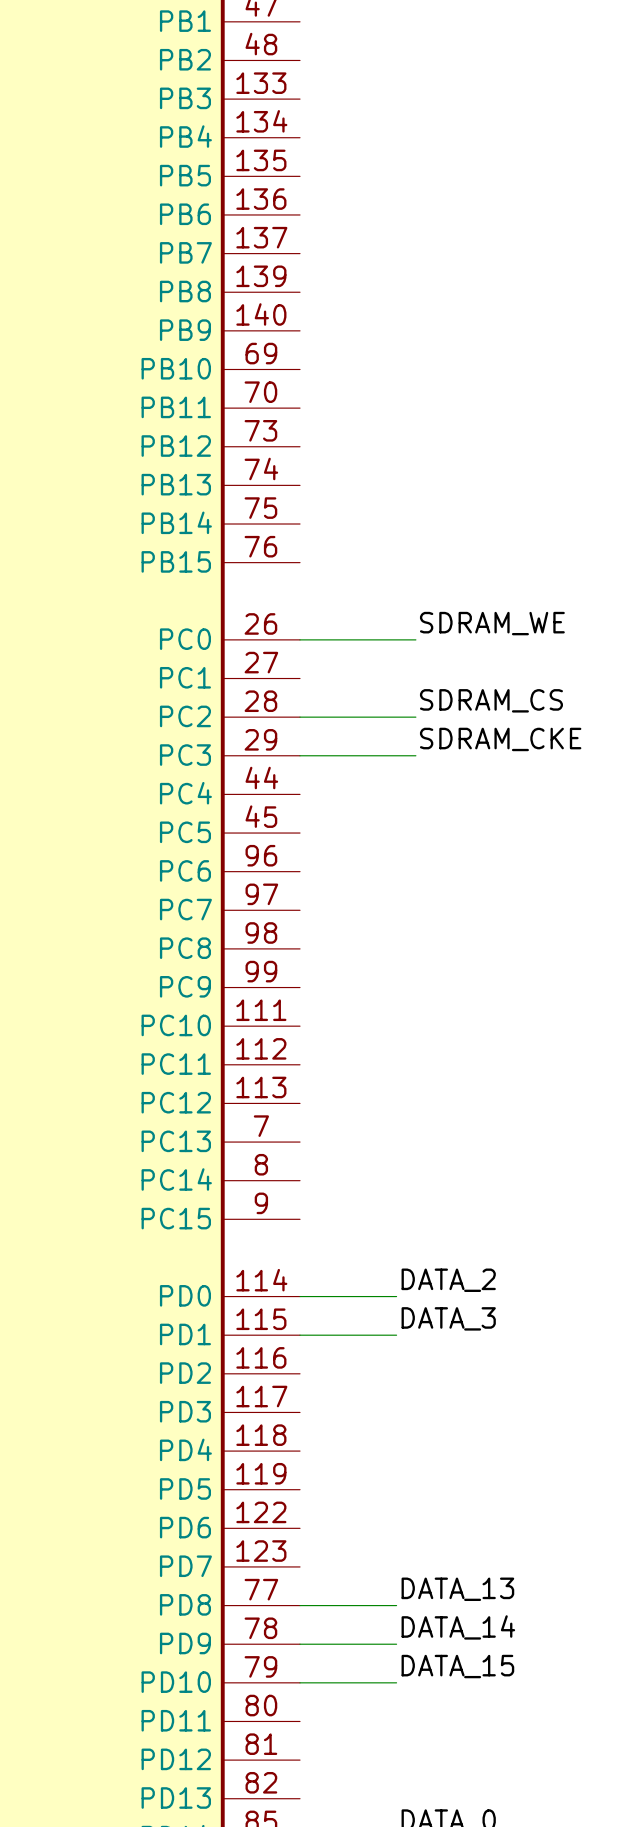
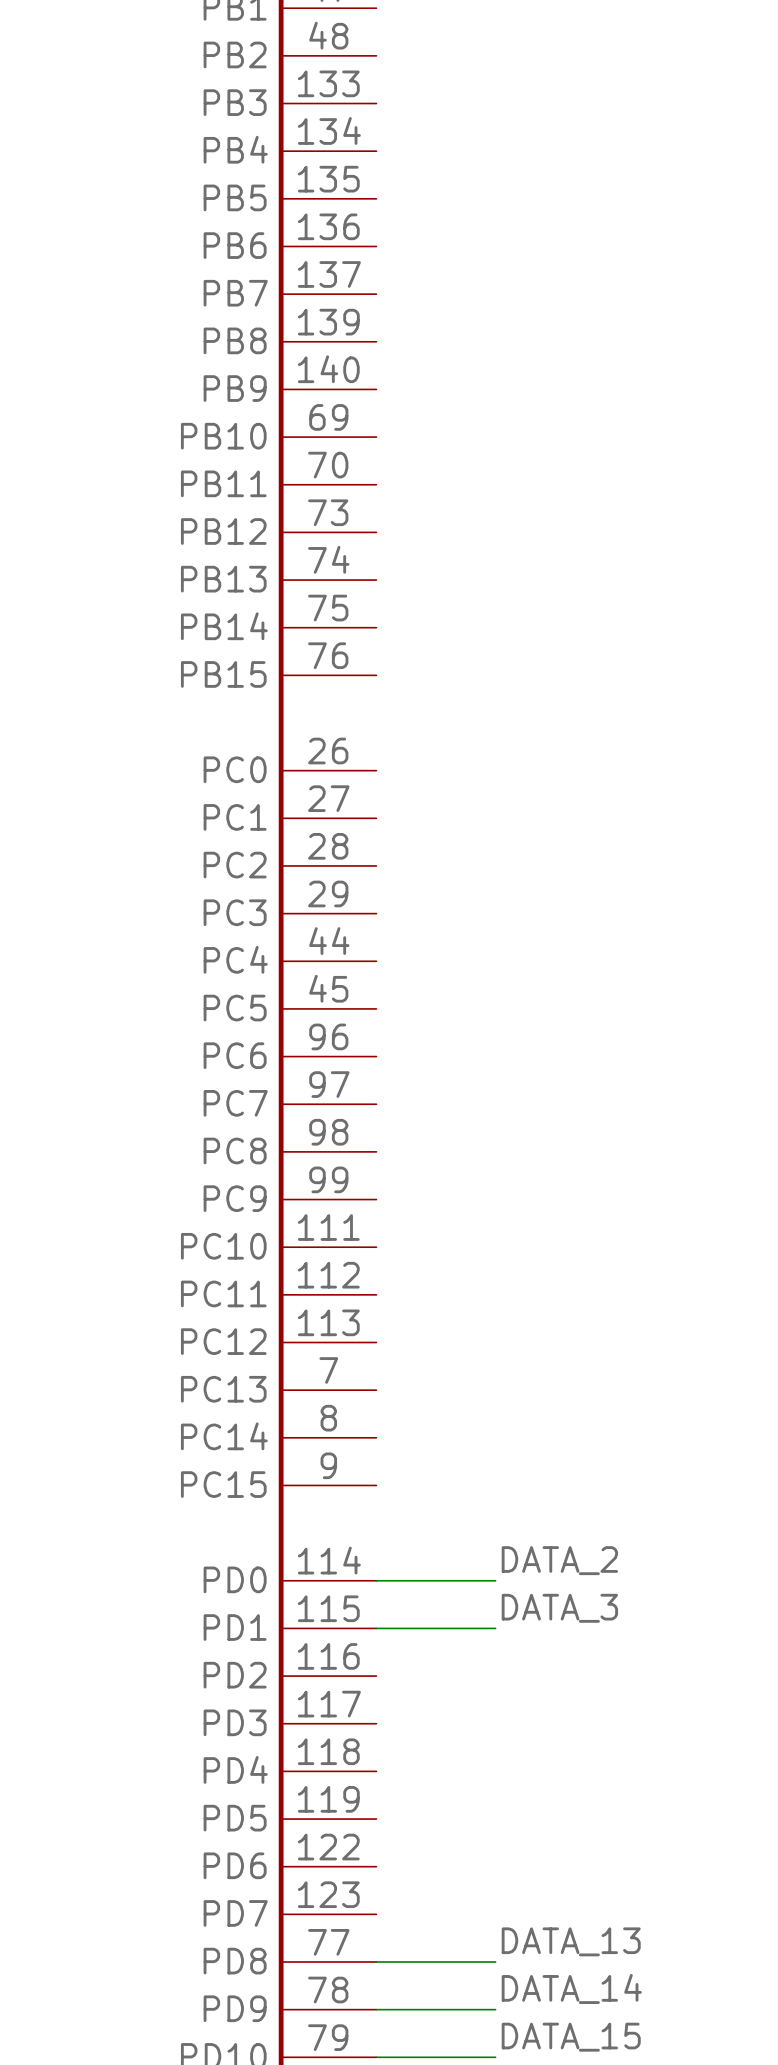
label: SDRAM_WE (492, 623) -> none
wire: (300, 639) (415, 639) -> none
label: SDRAM_CS (491, 700) -> none
wire: (300, 717) (415, 717) -> none
label: SDRAM_CKE (500, 739) -> none
wire: (300, 755) (415, 755) -> none

